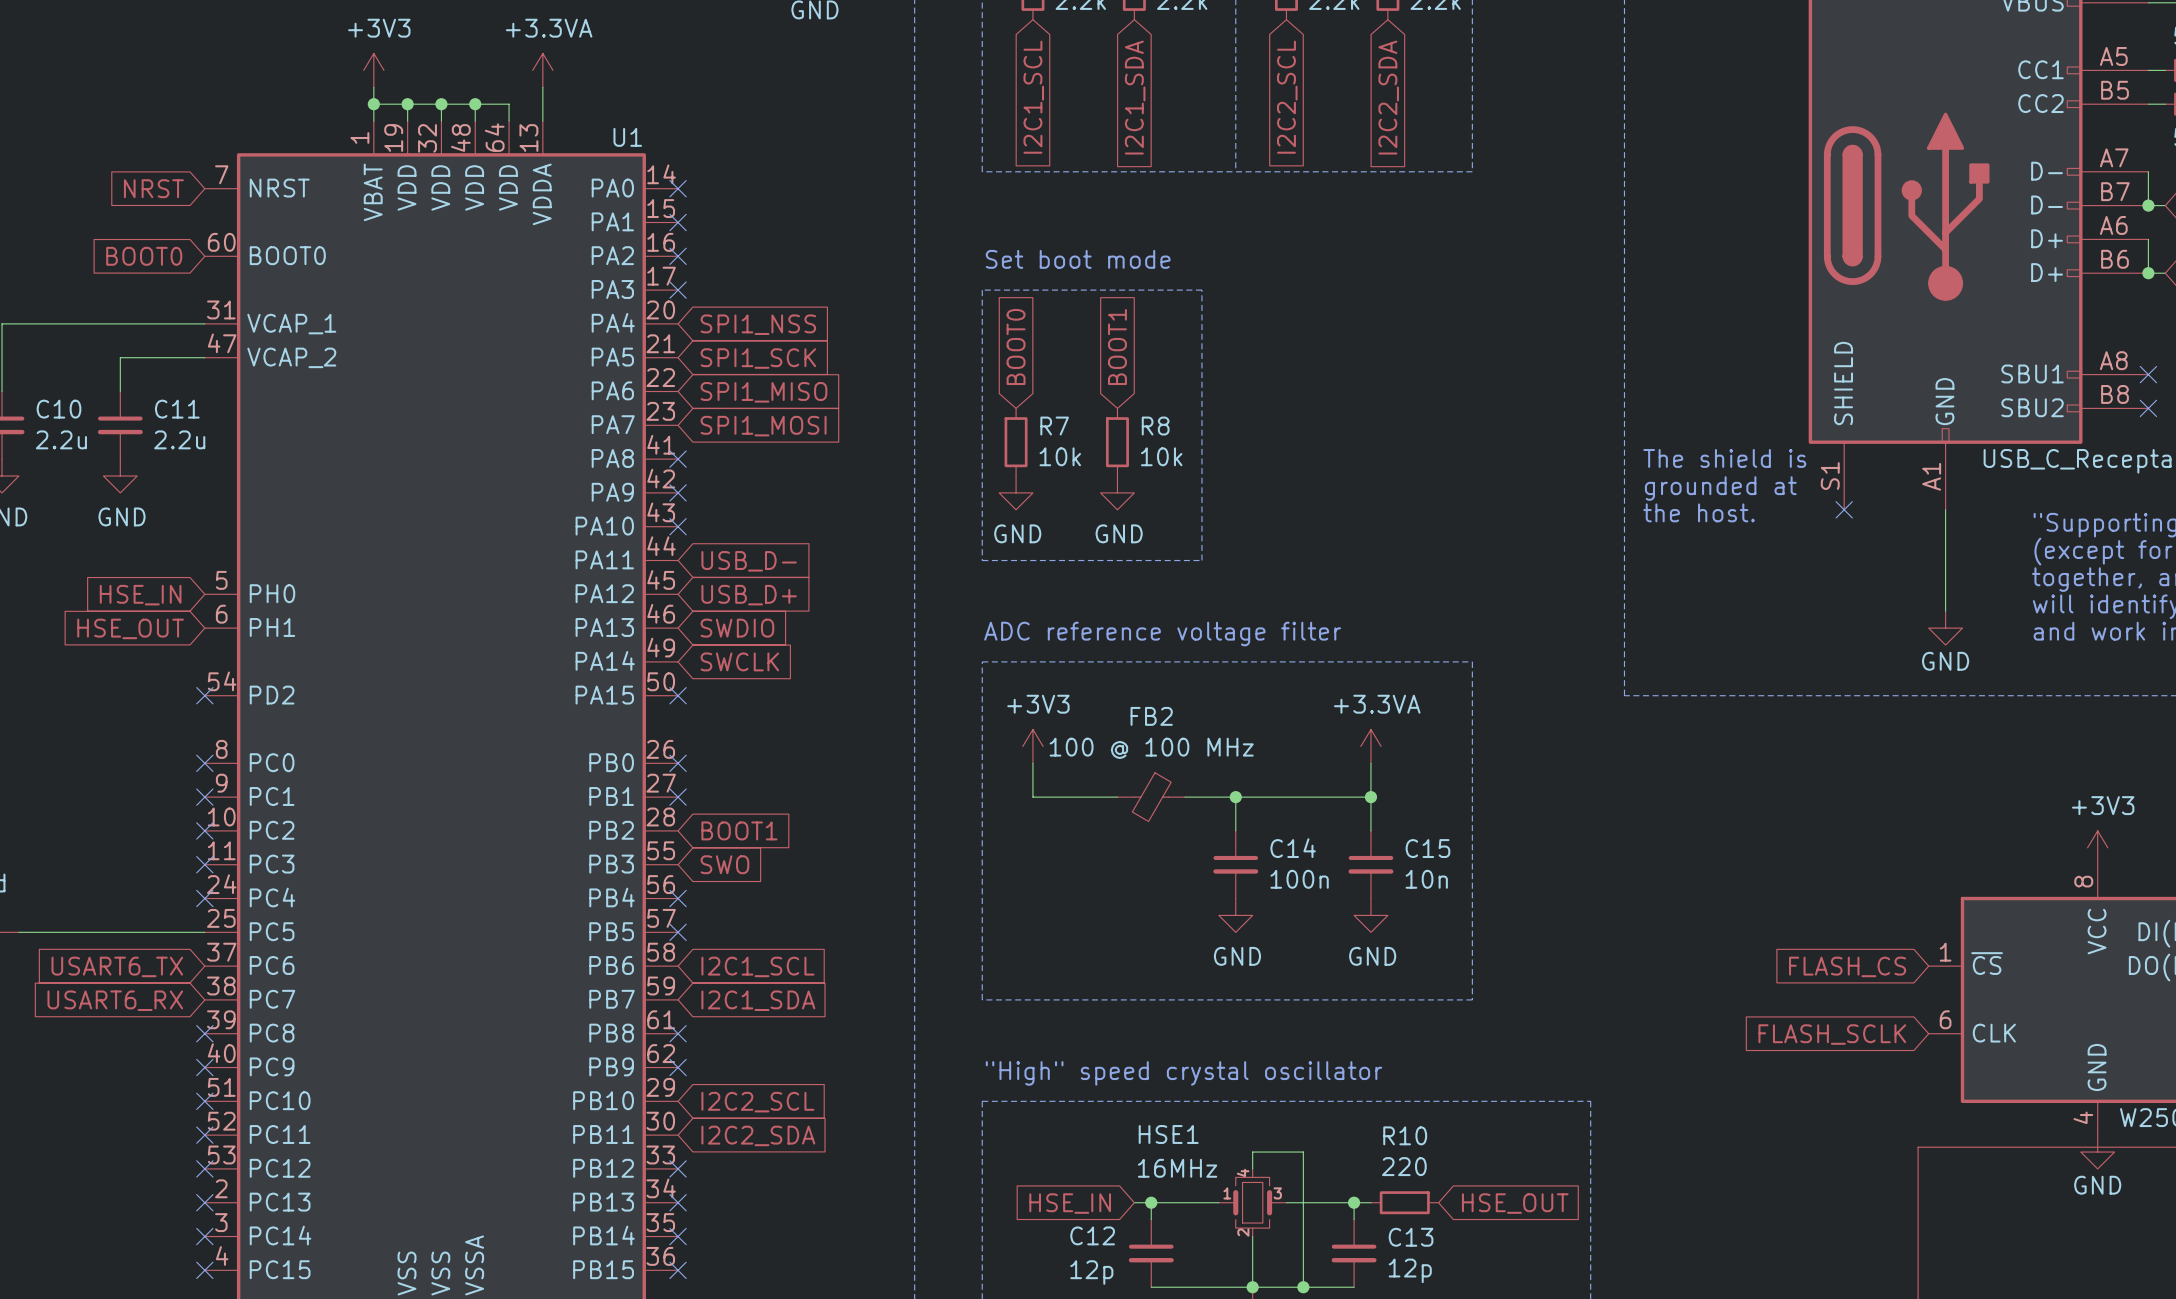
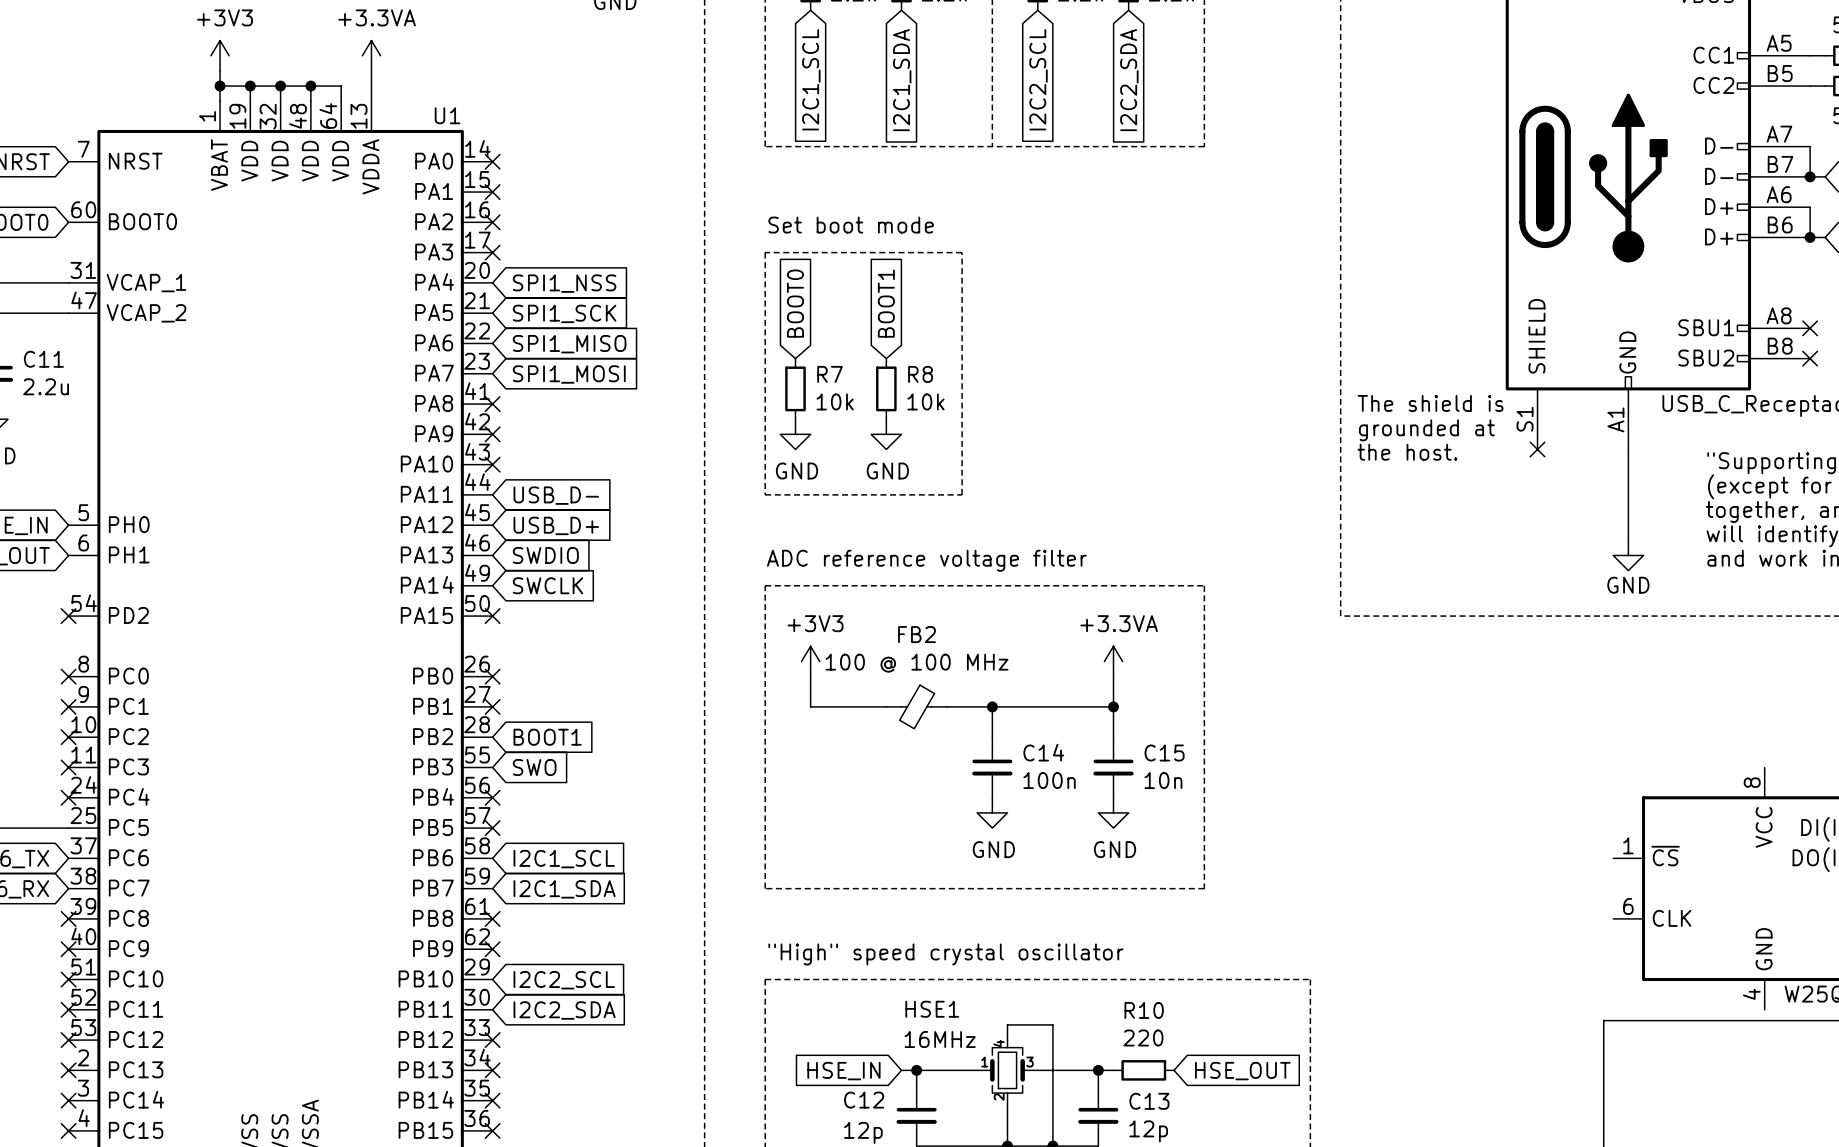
power symbol: +3V3 (2097, 847) -> none
global label: FLASH_CS (1847, 966) -> none
global label: FLASH_SCLK (1832, 1034) -> none
power symbol: GND (2097, 1152) -> none

